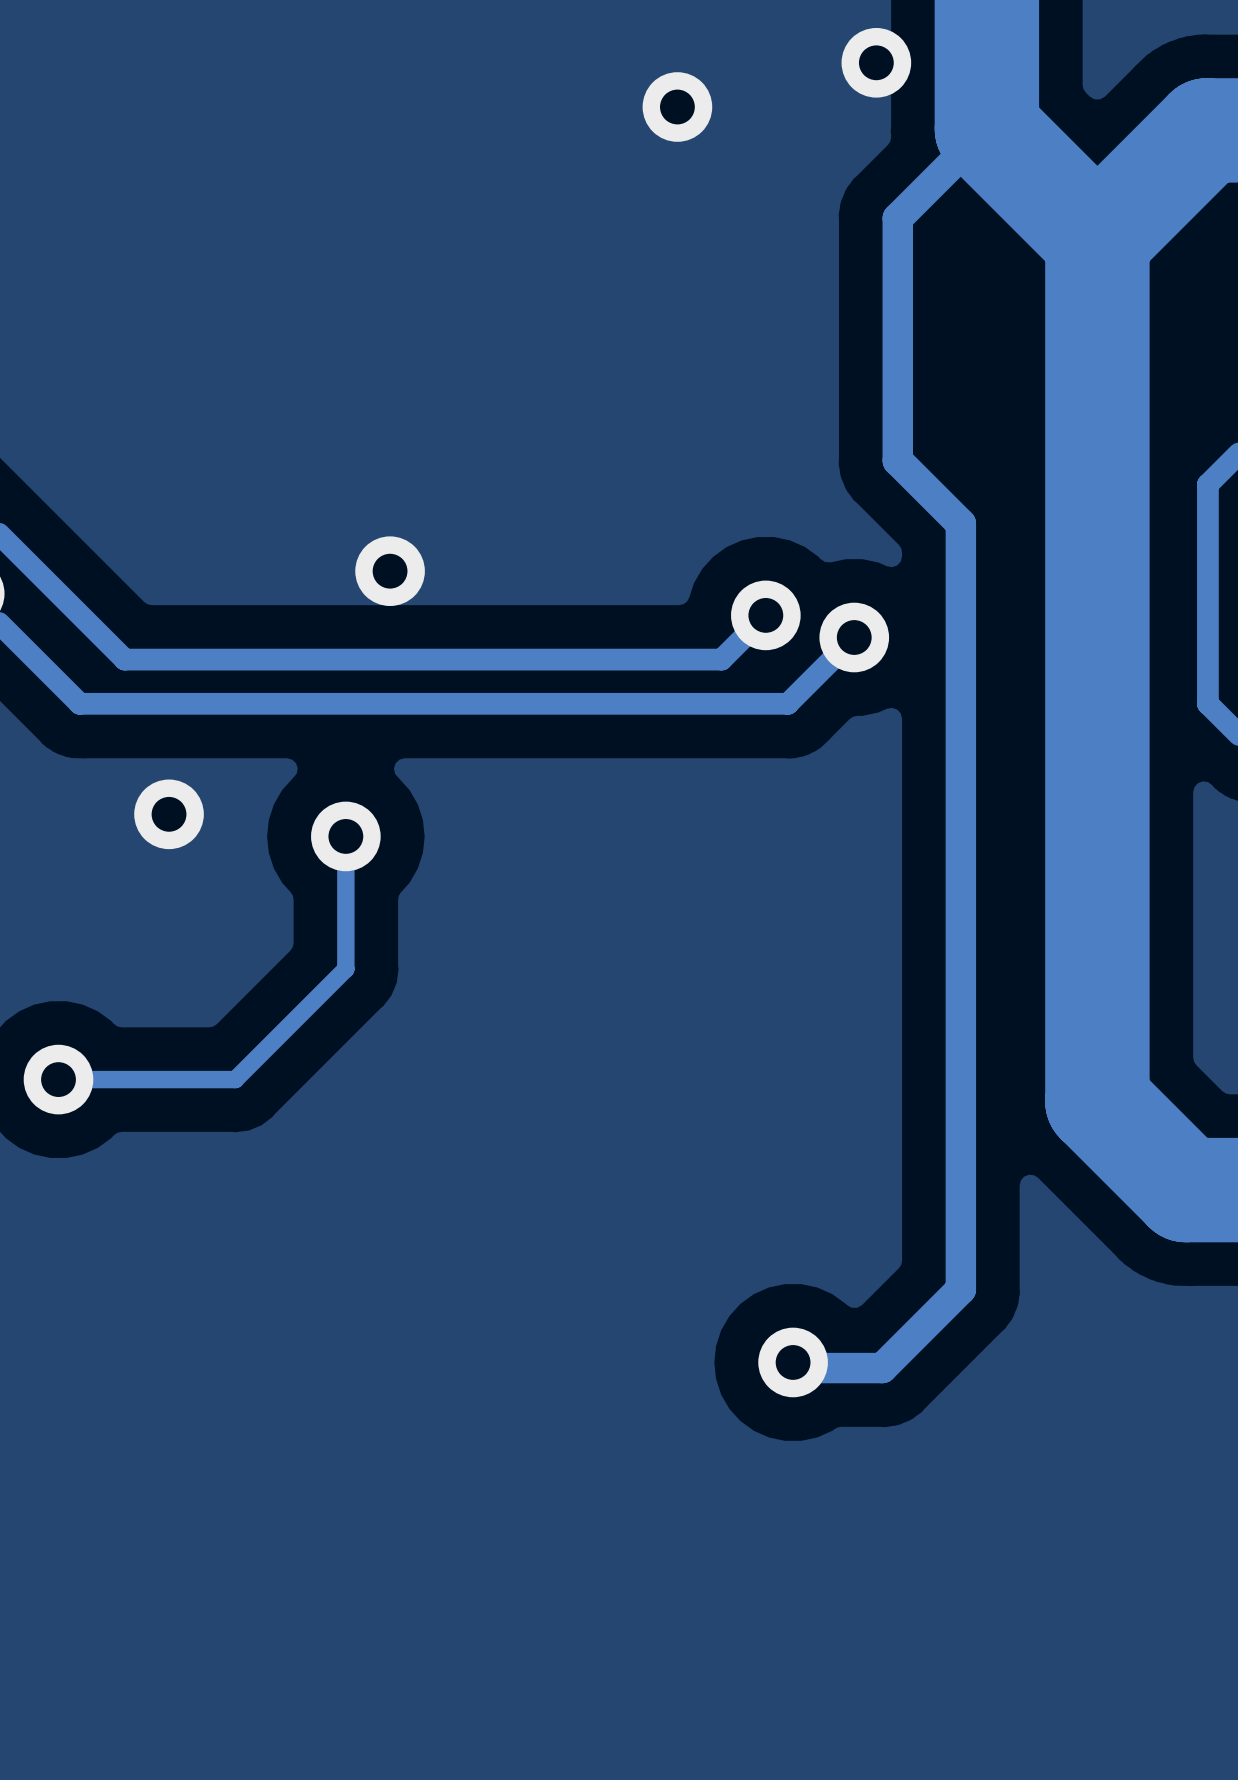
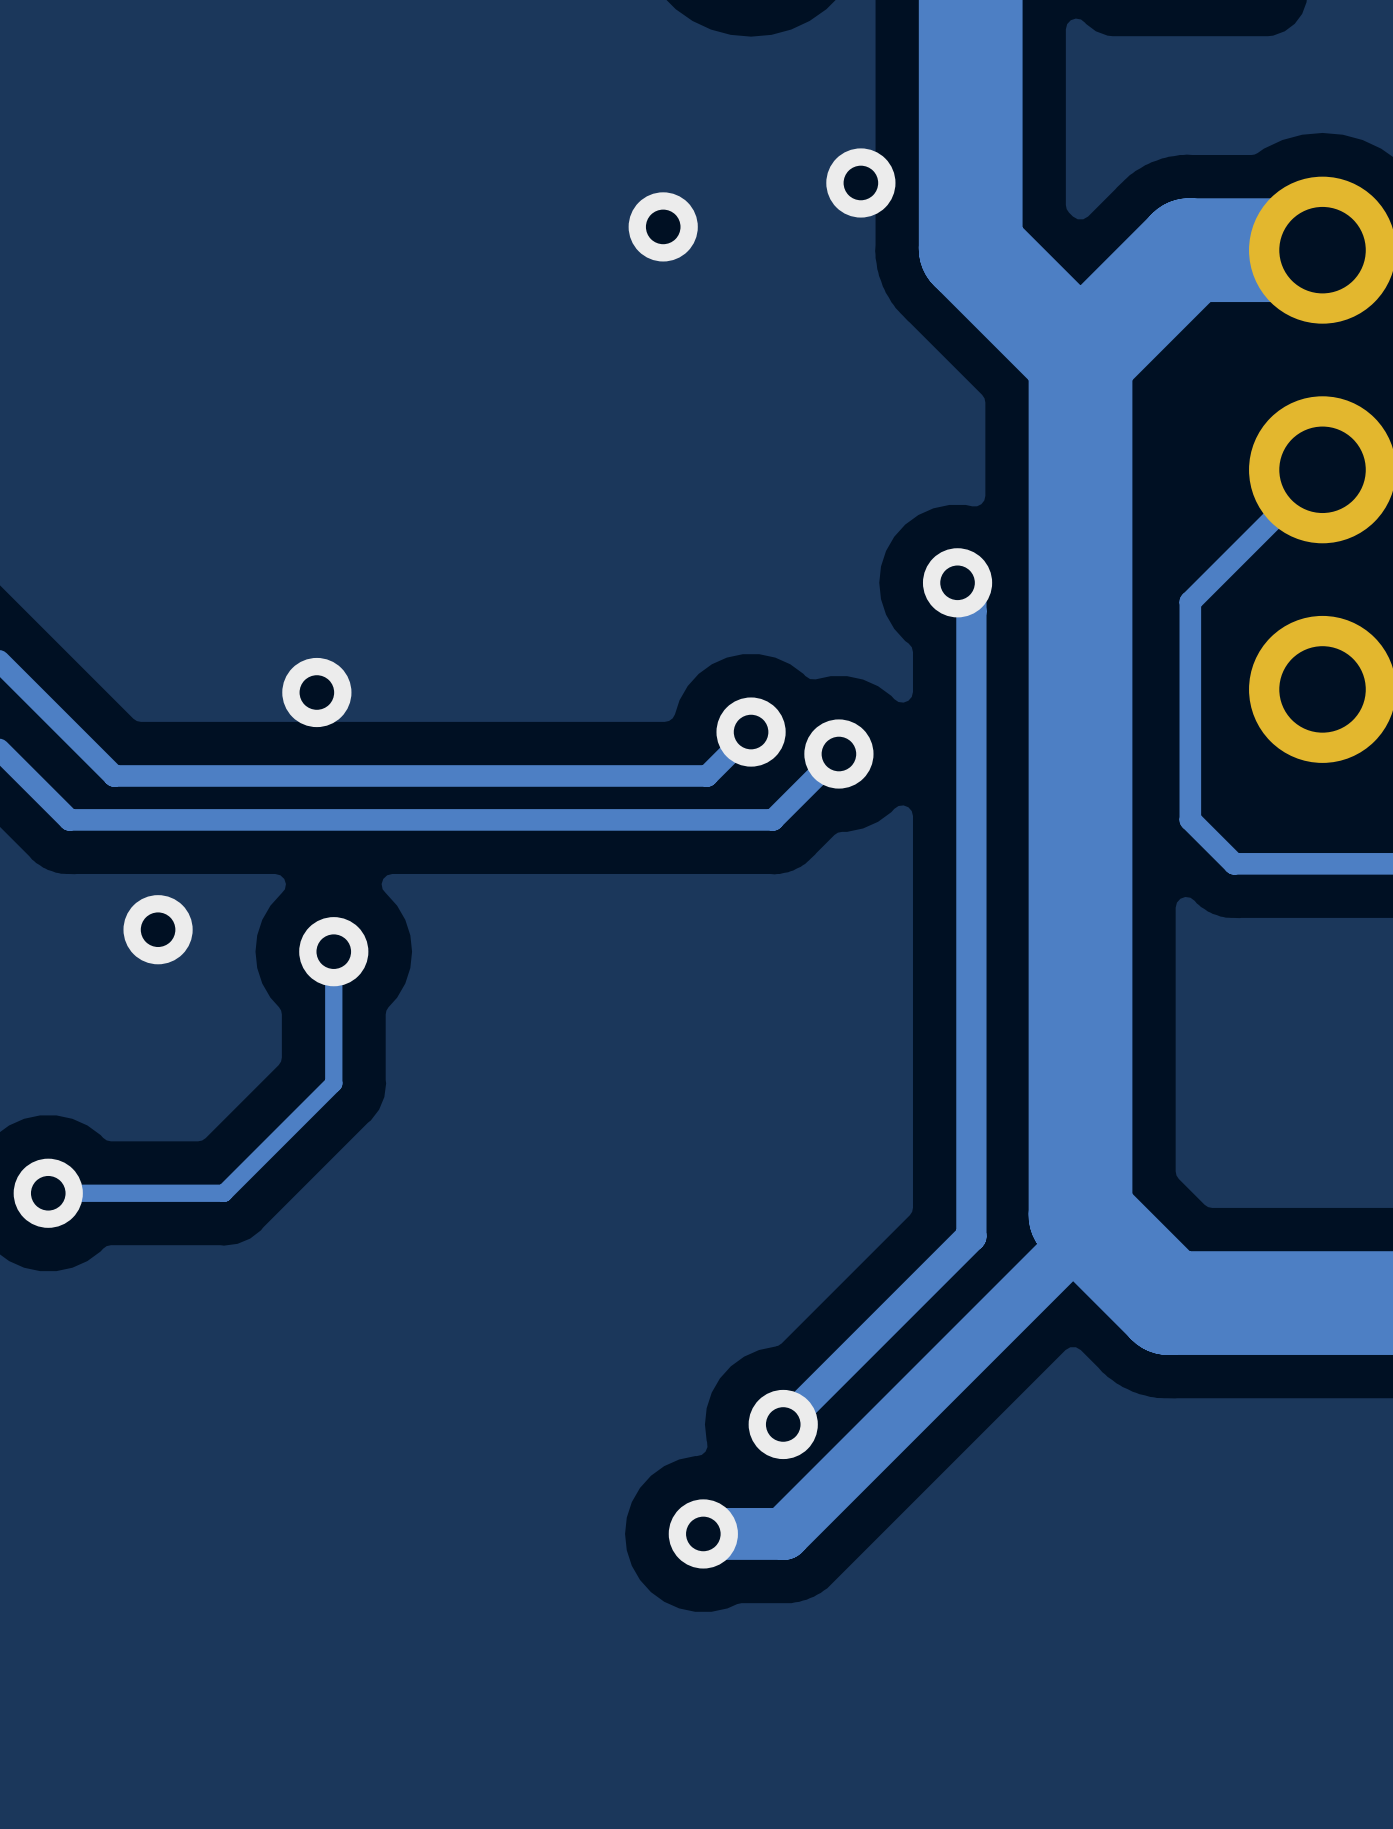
track: (986, 129) (897, 218) (897, 460) (960, 523) (960, 1289) (882, 1368) (798, 1368) (793, 1362) -> none
track: none -> (957, 582) (971, 596) (971, 1236) (783, 1424)
via: none -> (957, 582)
via position: (390, 571) -> (316, 692)
track: none -> (1080, 1215) (1080, 1237) (783, 1533) (703, 1533)
via position: (793, 1362) -> (783, 1424)
via: none -> (703, 1533)

